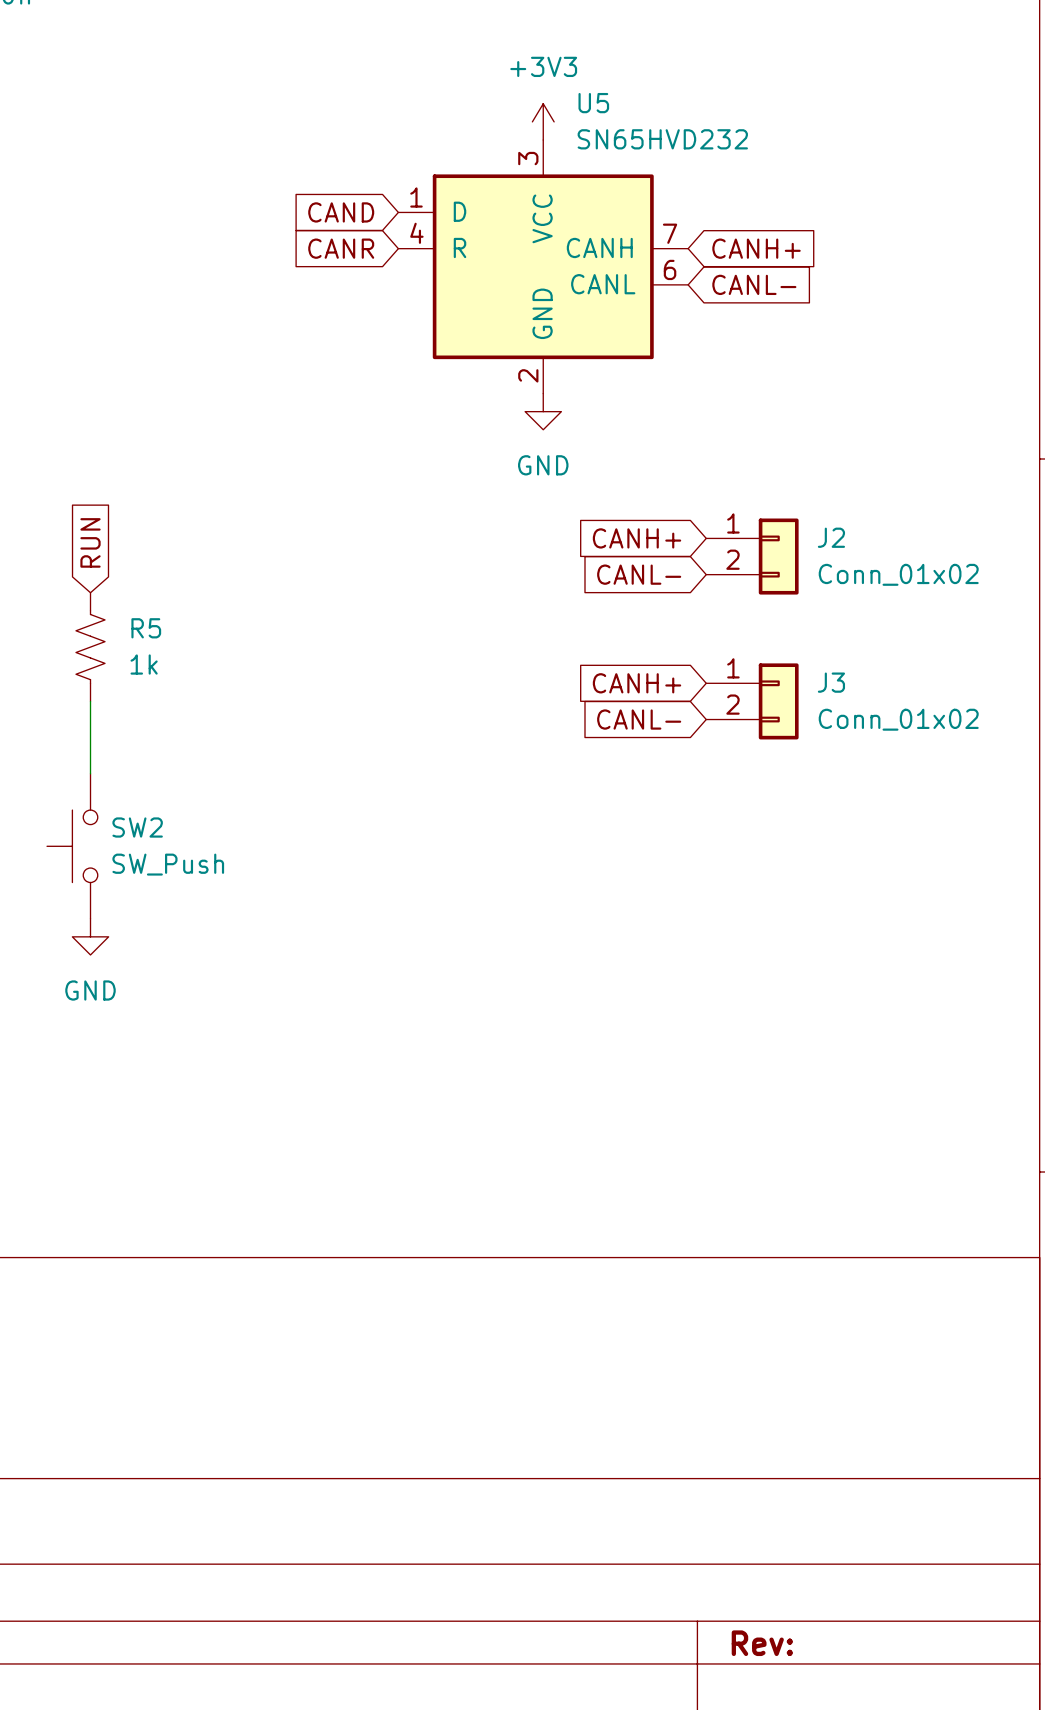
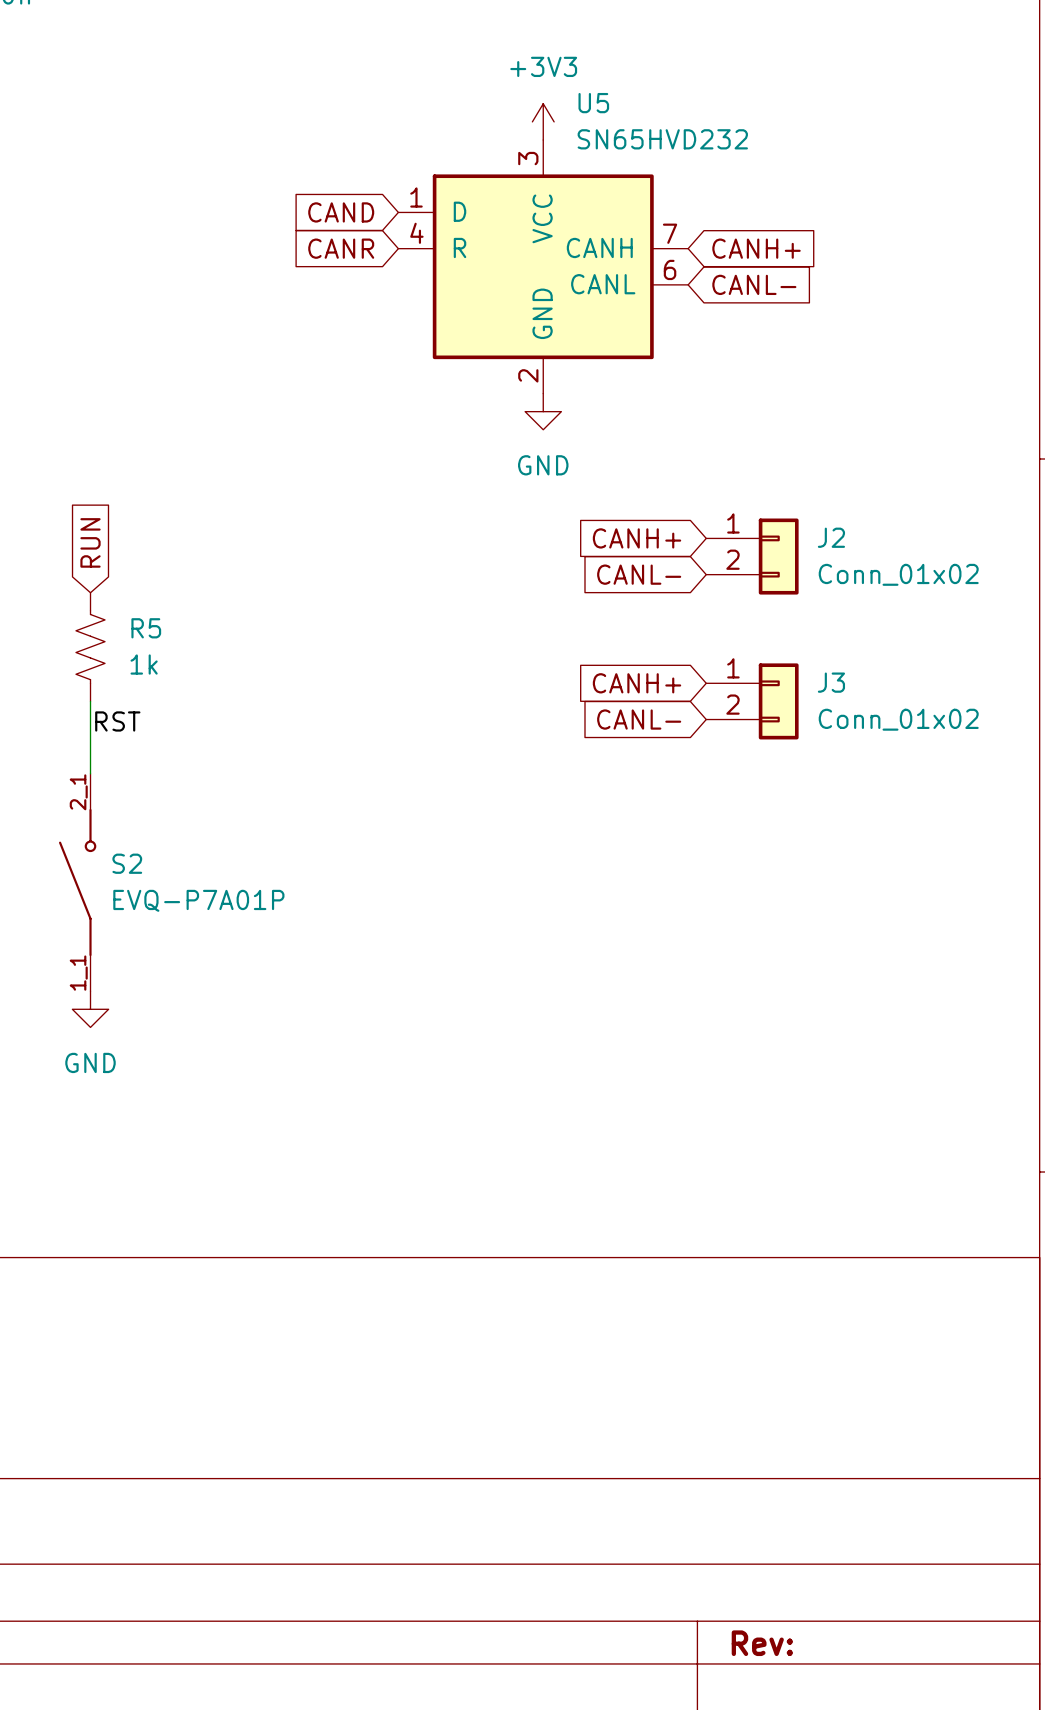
label: none -> RST (117, 721)
SW2: SW_Push (72, 846) -> none
S2: none -> EVQ-P7A01P (77, 882)
power symbol position: GND (90, 936) -> GND (90, 1009)

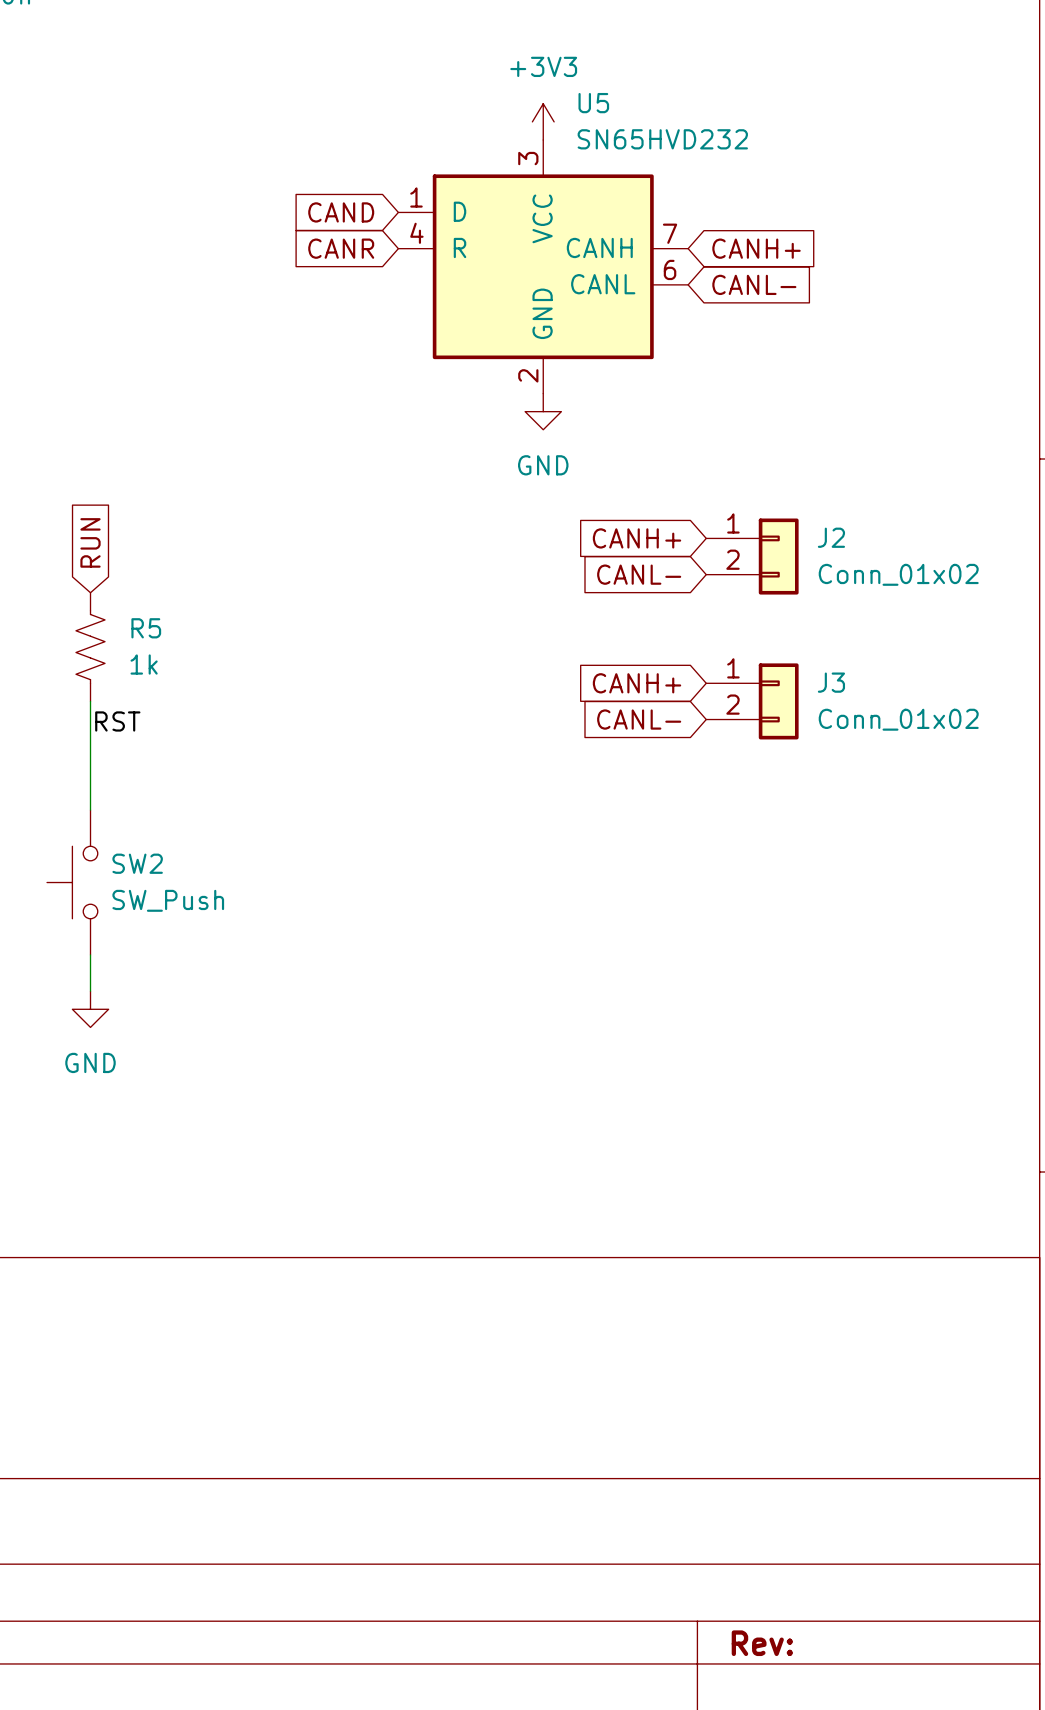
SW2: none -> SW_Push (72, 882)
S2: EVQ-P7A01P (77, 882) -> none

